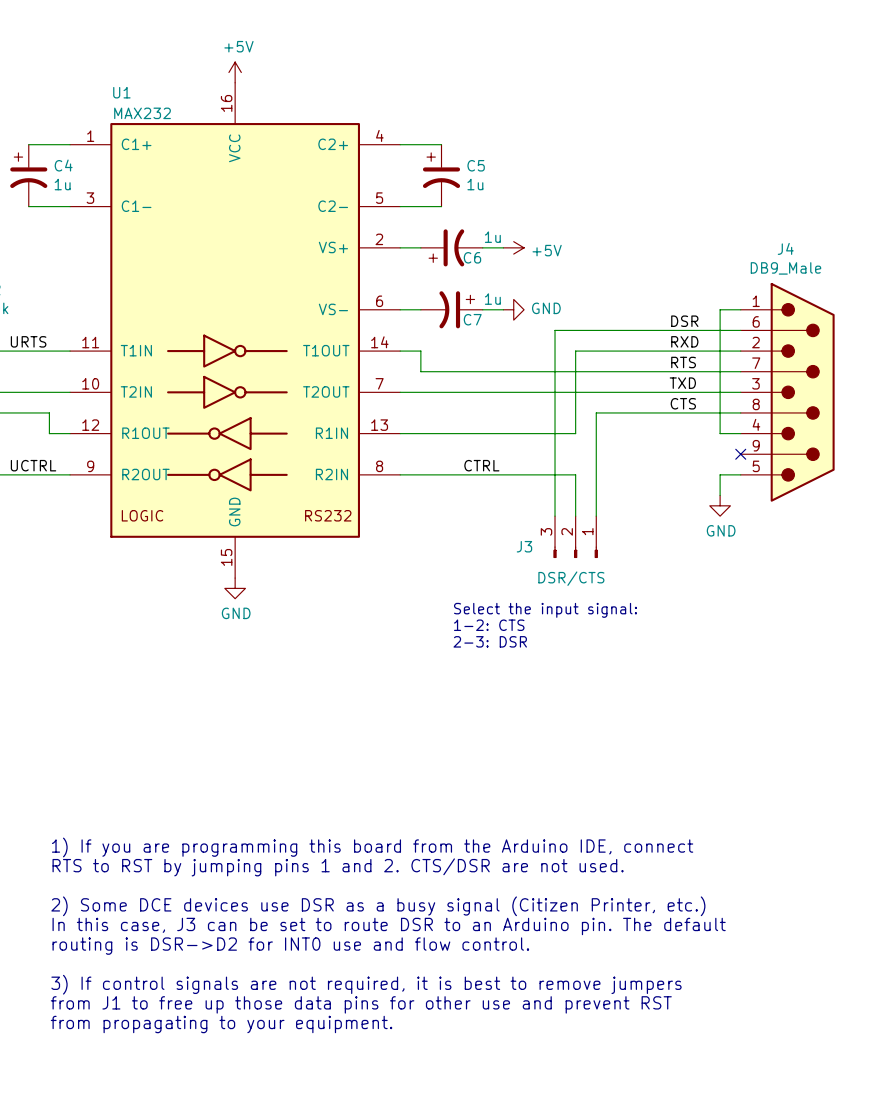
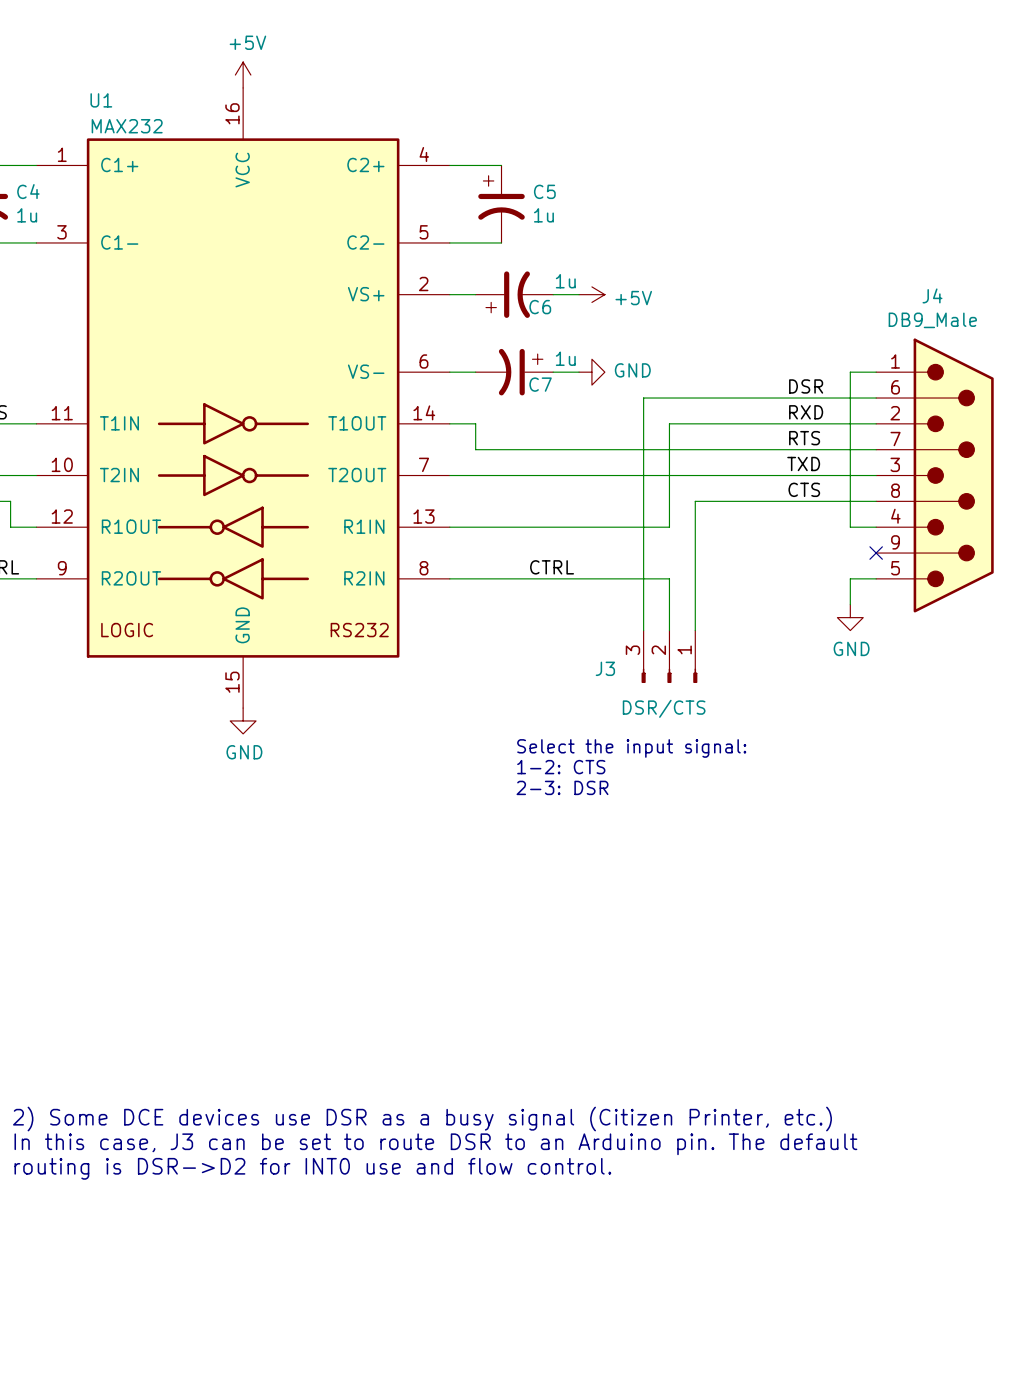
text: 1) If you are programming this board from the Arduino IDE, connect (372, 847) -> none
text: RTS to RST by jumping pins 1 and 2. CTS/DSR are not used. (338, 867) -> none
text: 3) If control signals are not required, it is best to remove jumpers (366, 984) -> none
text: from J1 to free up those data pins for other use and prevent RST (361, 1004) -> none
text: from propagating to your equipment. (221, 1024) -> none

